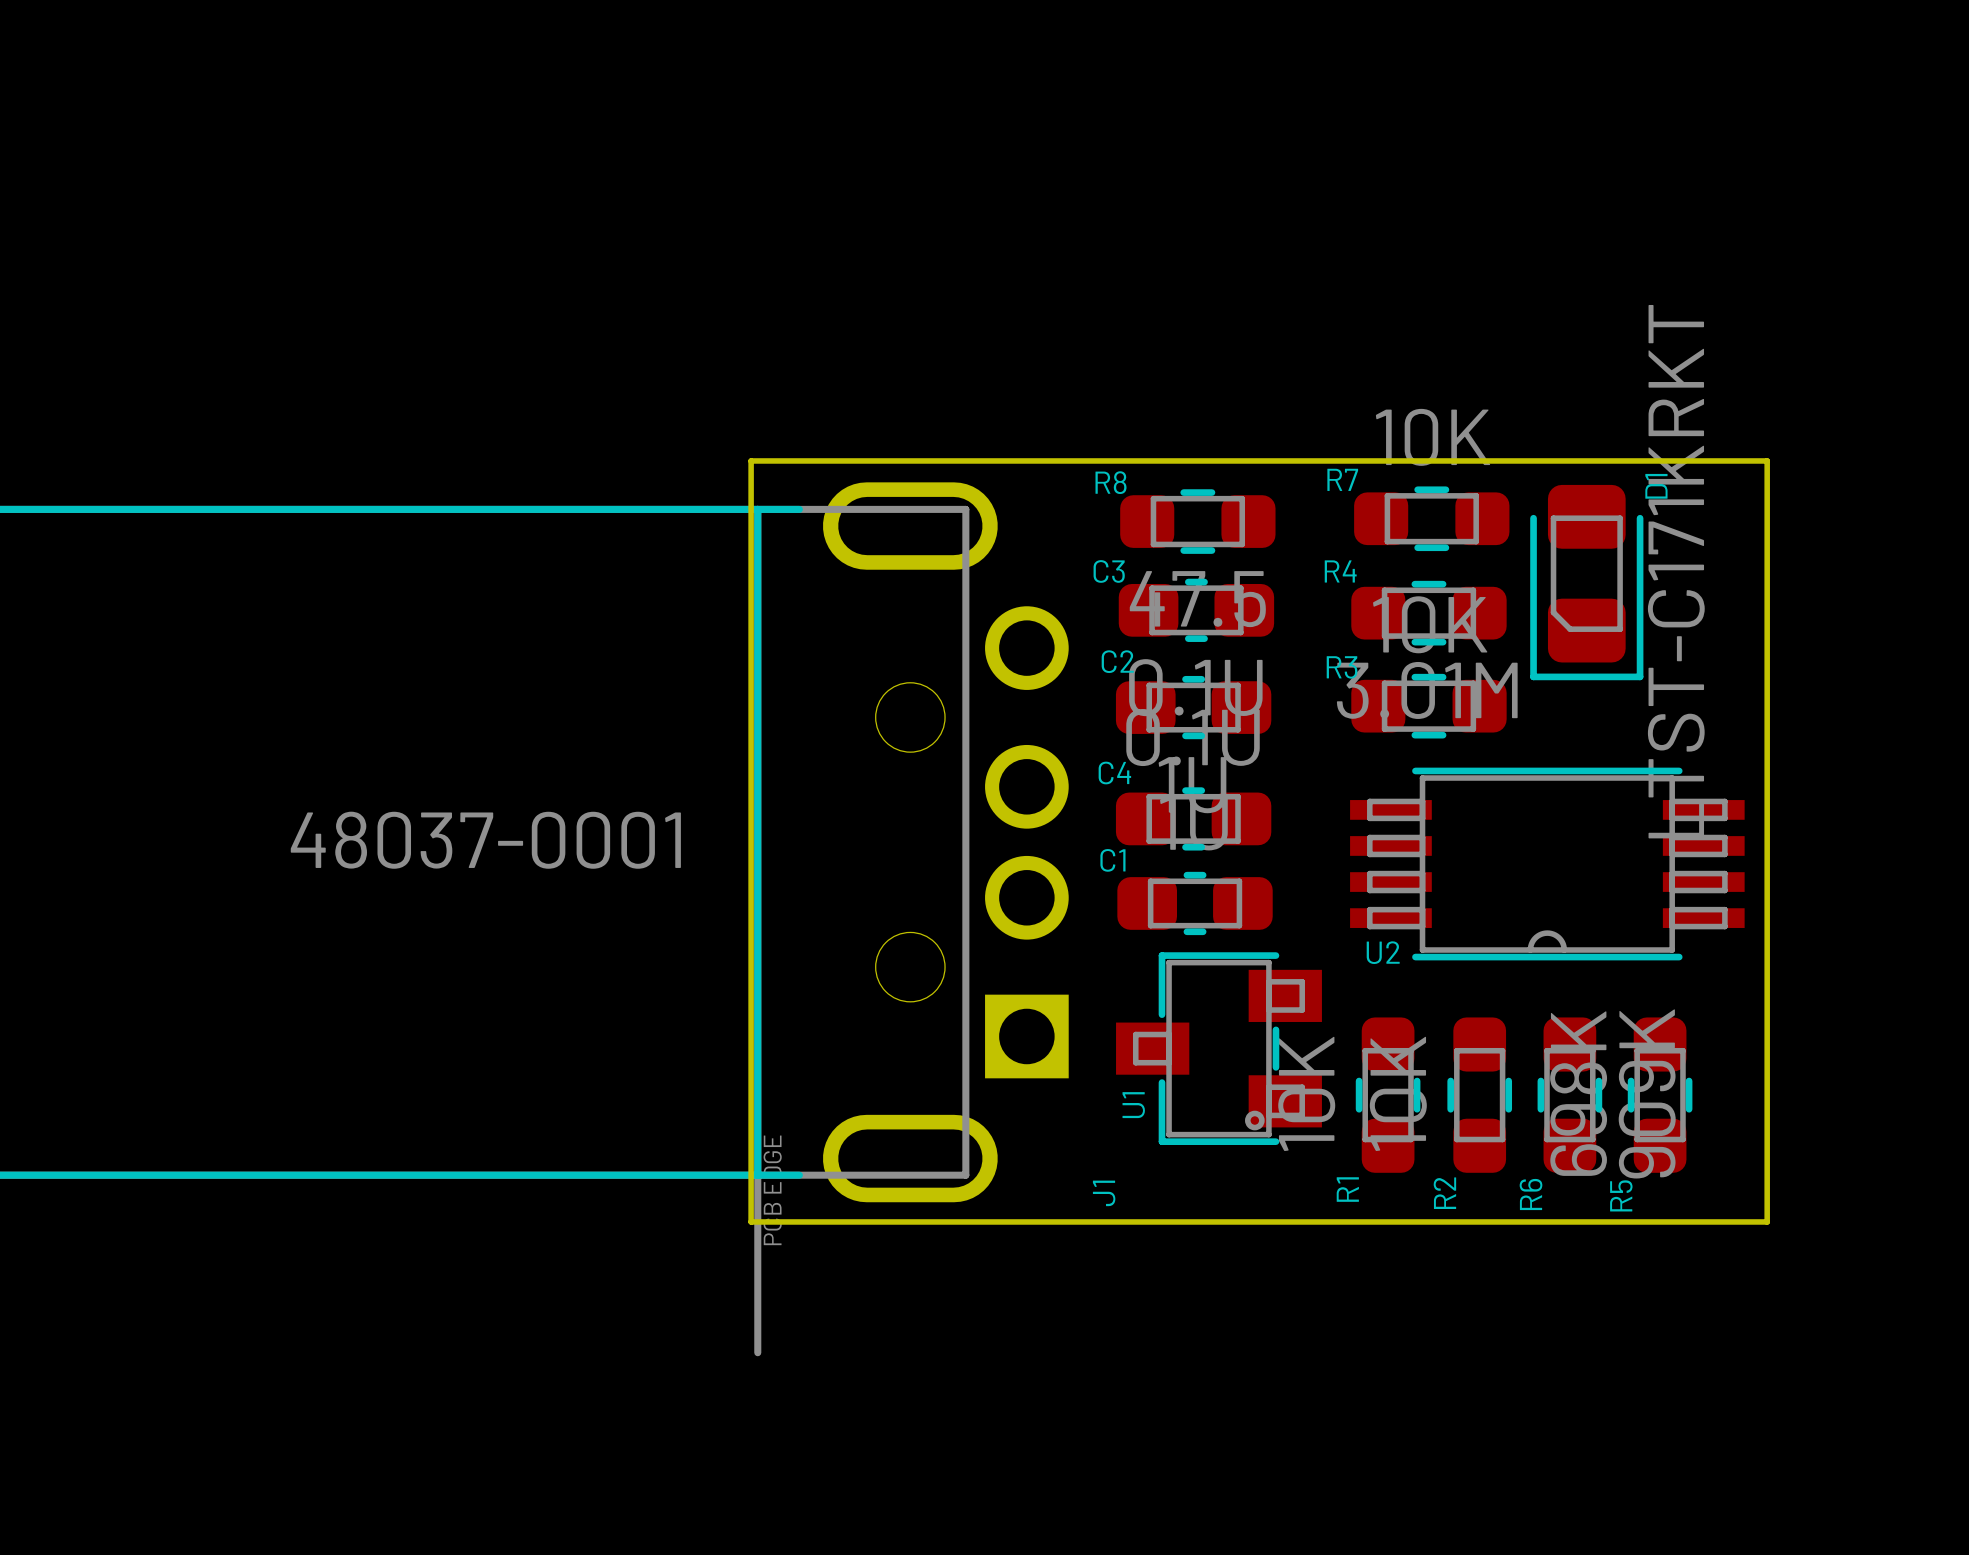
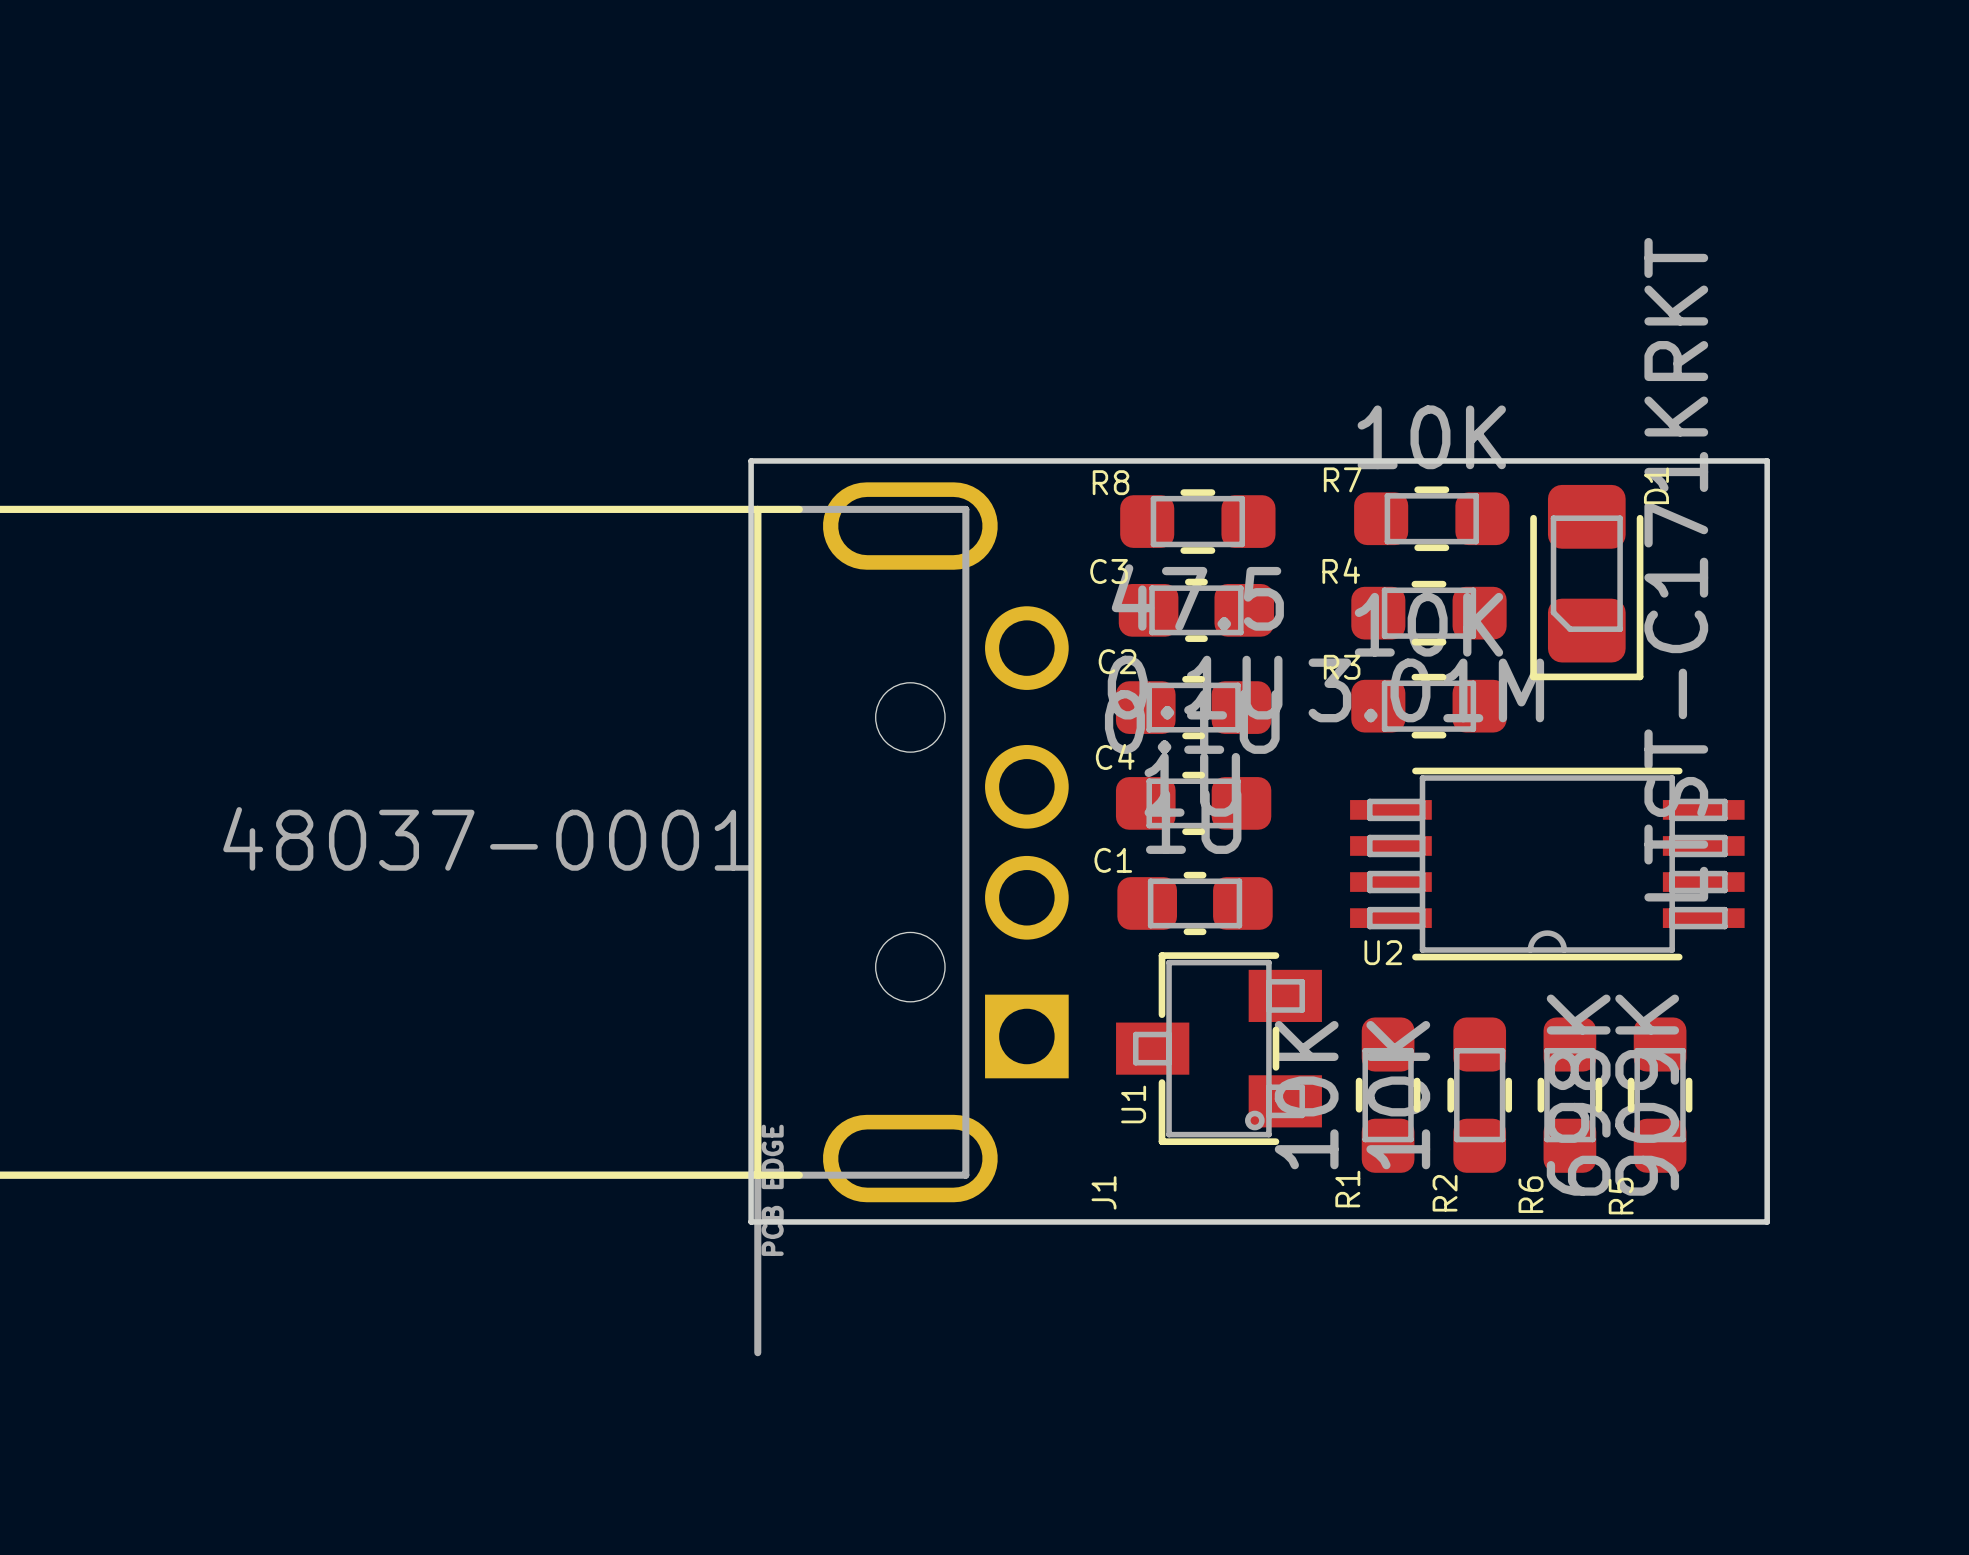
C4 position: (1193, 818) -> (1193, 803)

